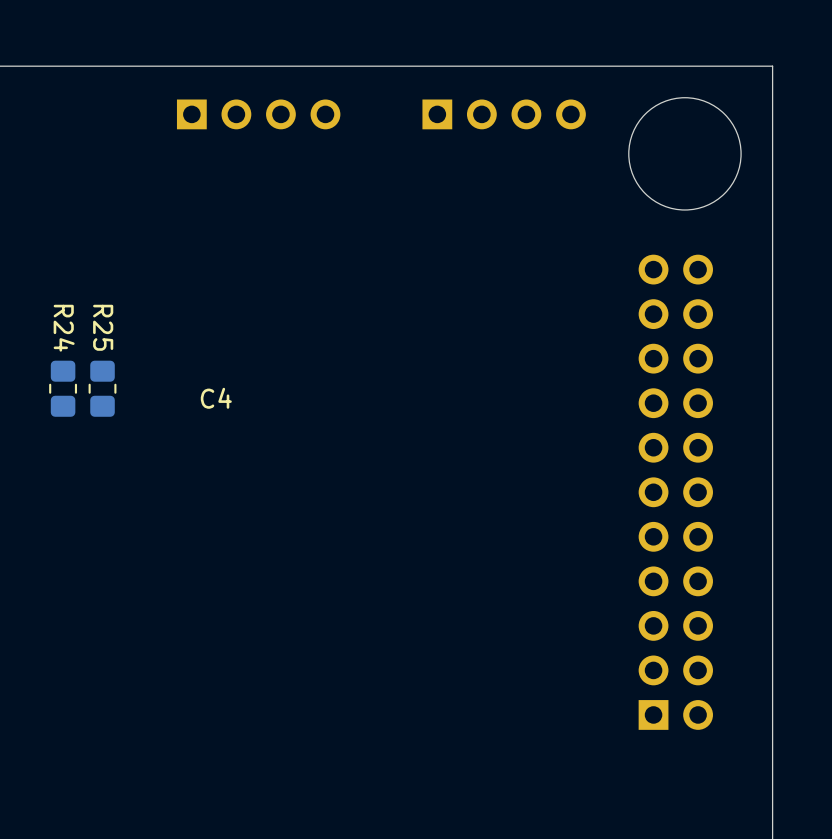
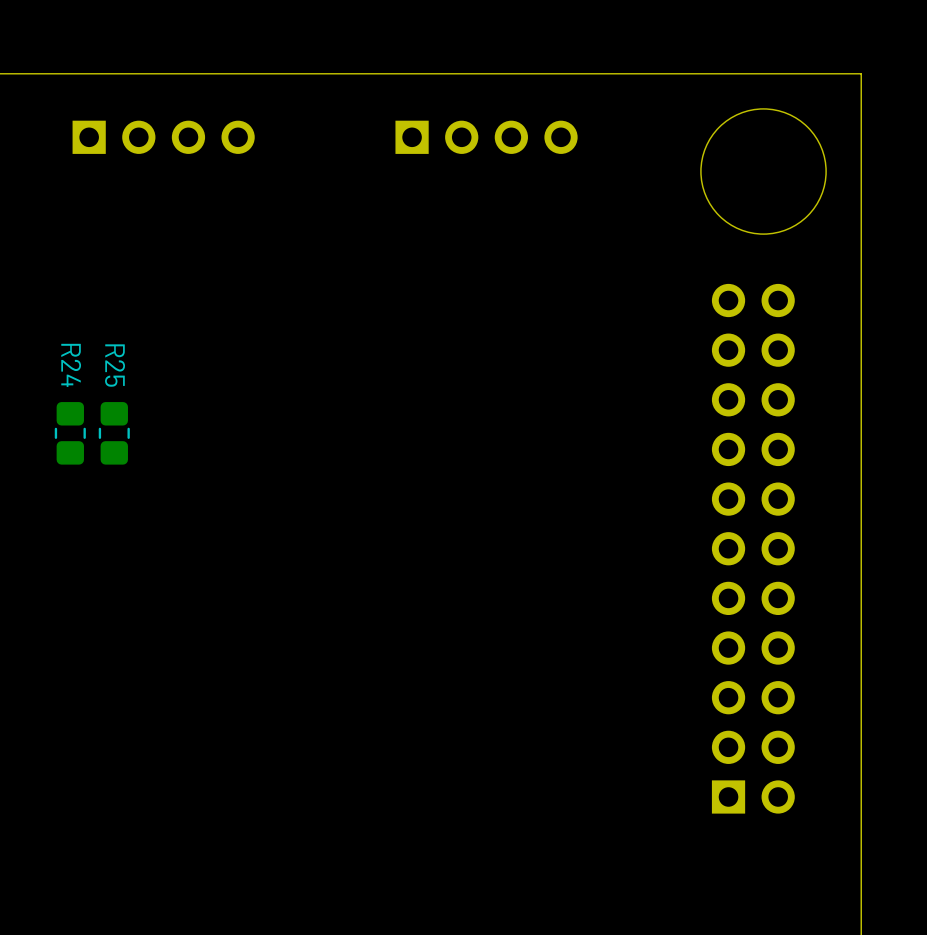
part: (258, 114) -> none
part position: (504, 114) -> (486, 137)
part: none -> (163, 137)
C4: (216, 398) -> none

